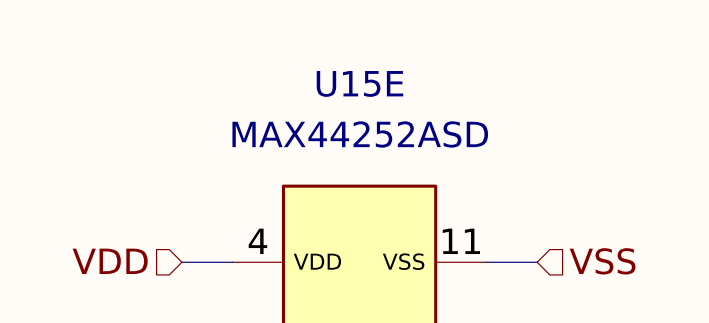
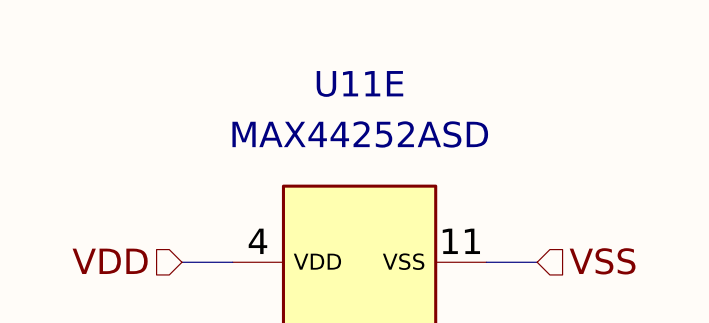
U15E name: U15E (359, 83) -> U11E (359, 83)

